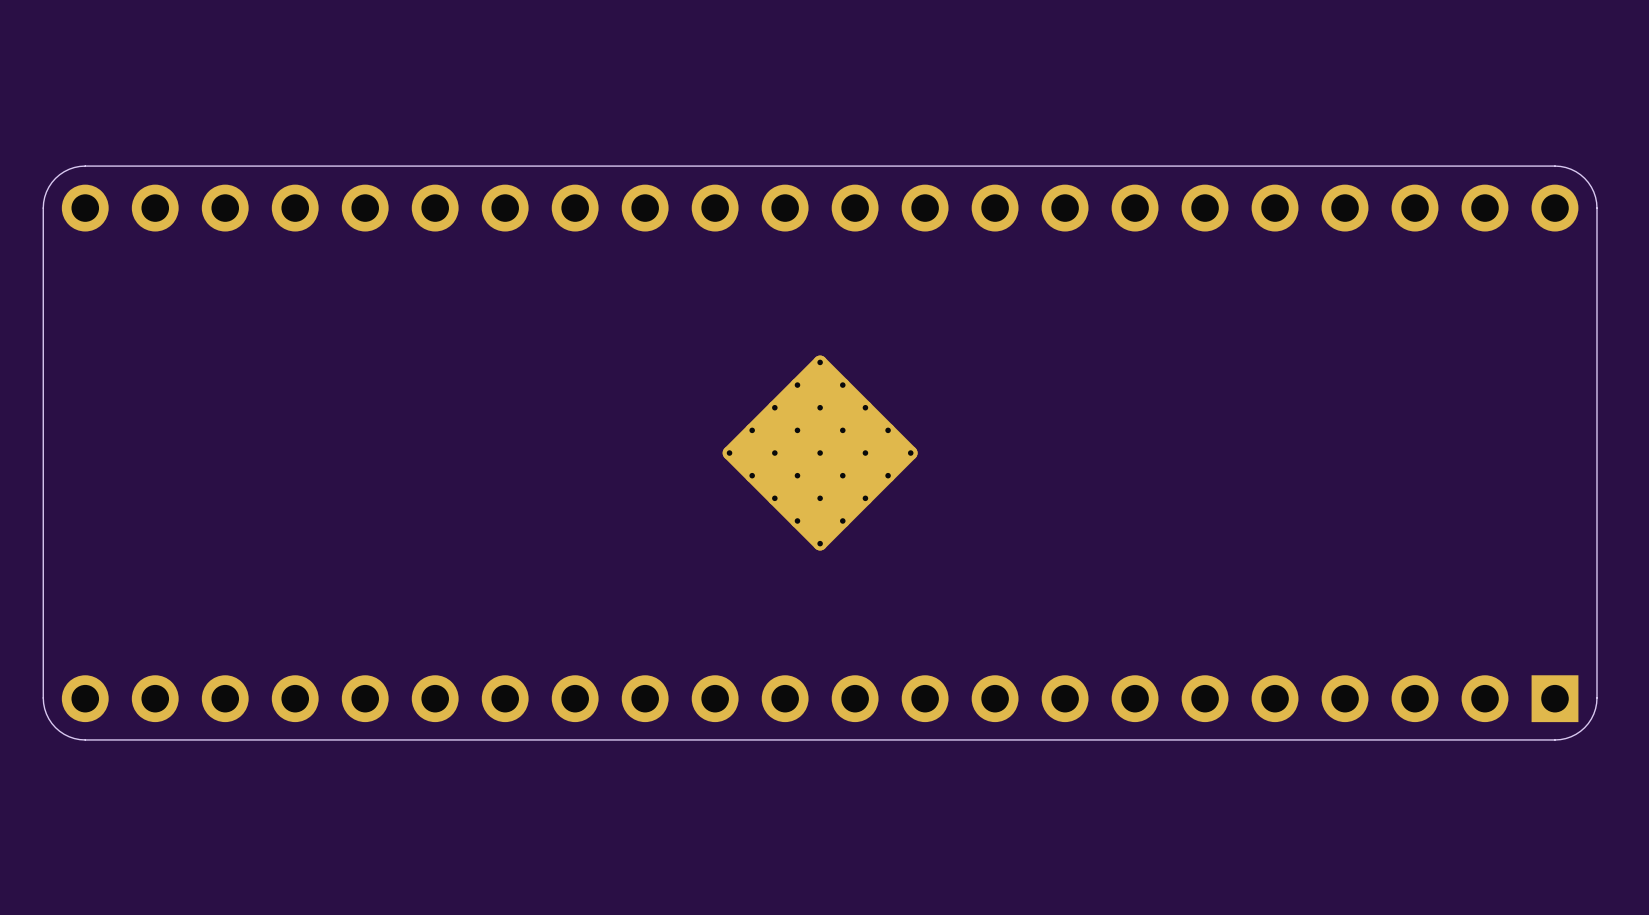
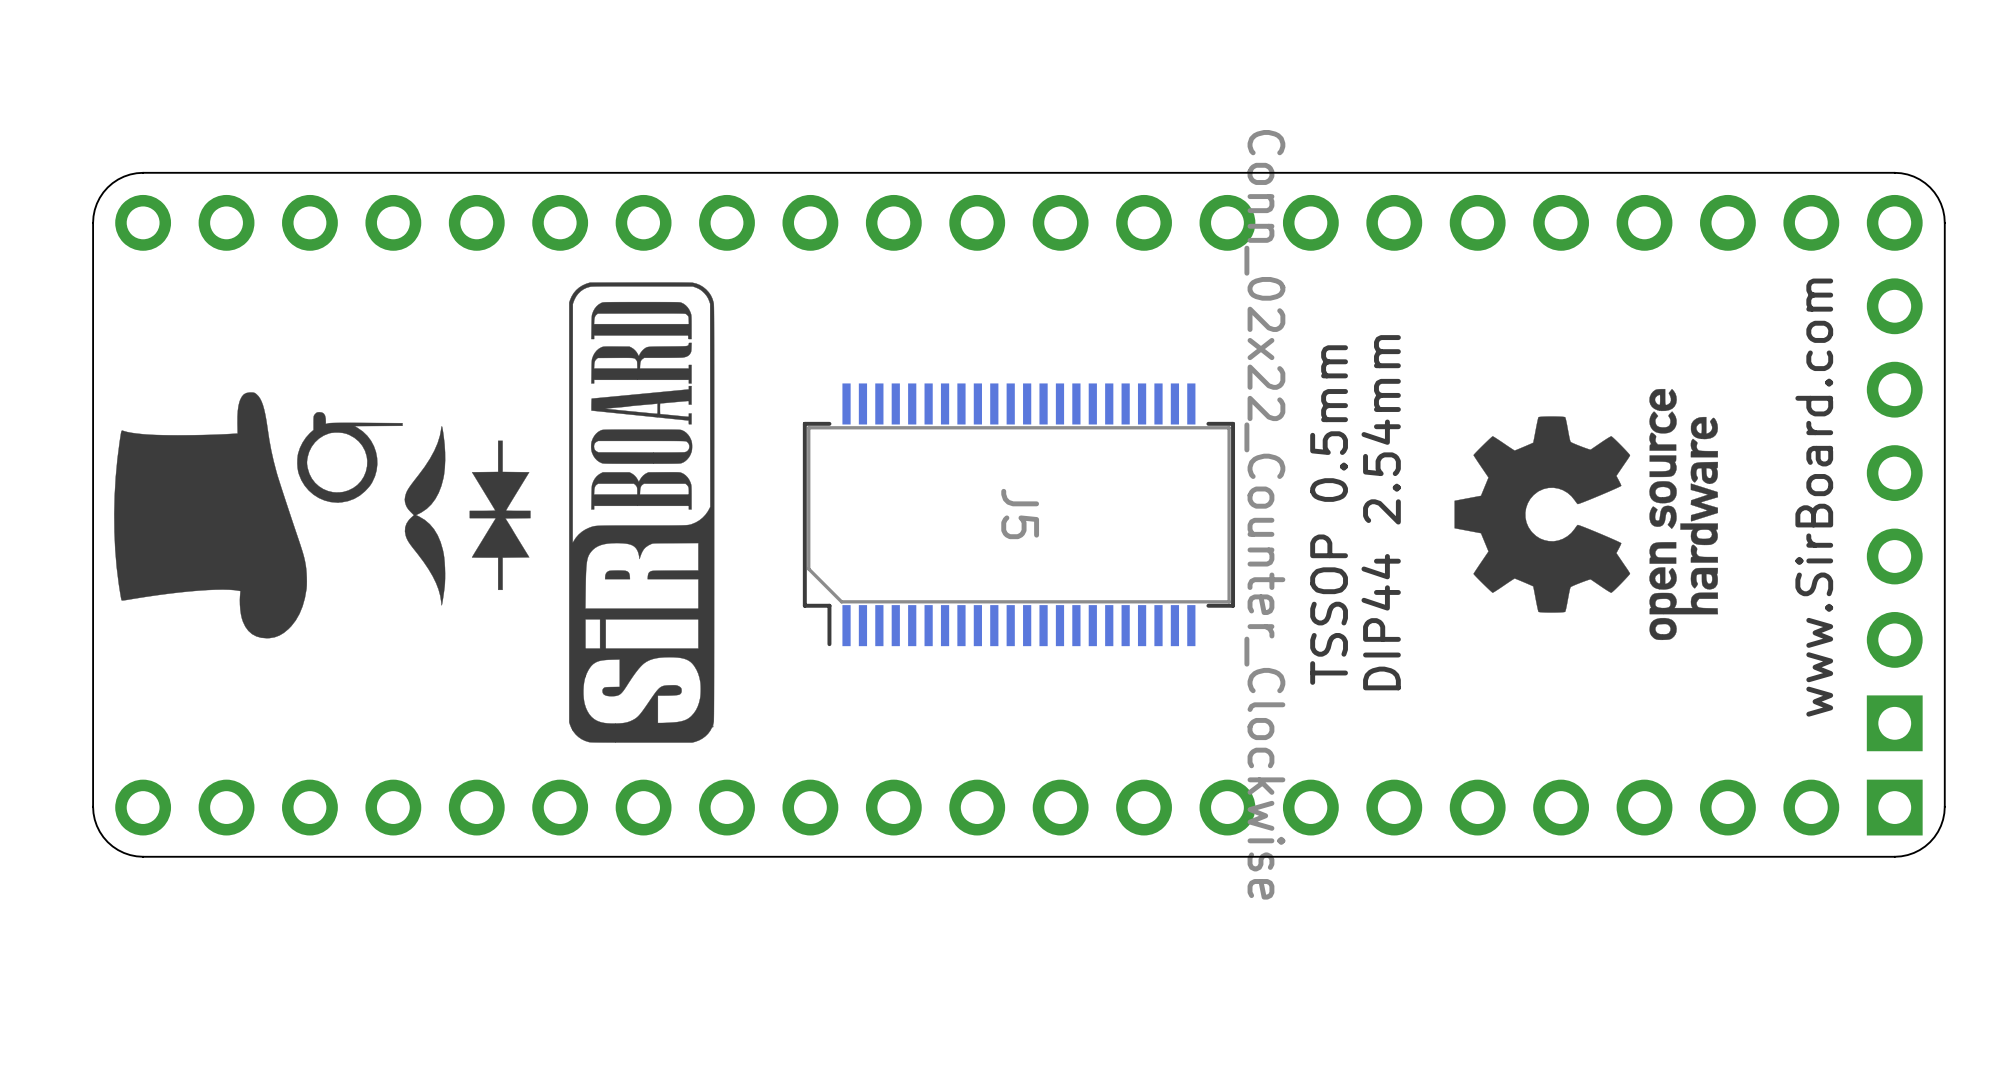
drawing: none -> [114, 282, 715, 743]
drawing: none -> [1454, 388, 1719, 641]
text: none -> www.SirBoard.com (1814, 497)
text: none -> DIP44 2.54mm (1381, 512)
text: none -> TSSOP 0.5mm (1329, 515)
part: (820, 453) -> none
J5: none -> Conn_02x22_Counter_Clockwise (1018, 514)
part: none -> (1894, 514)

